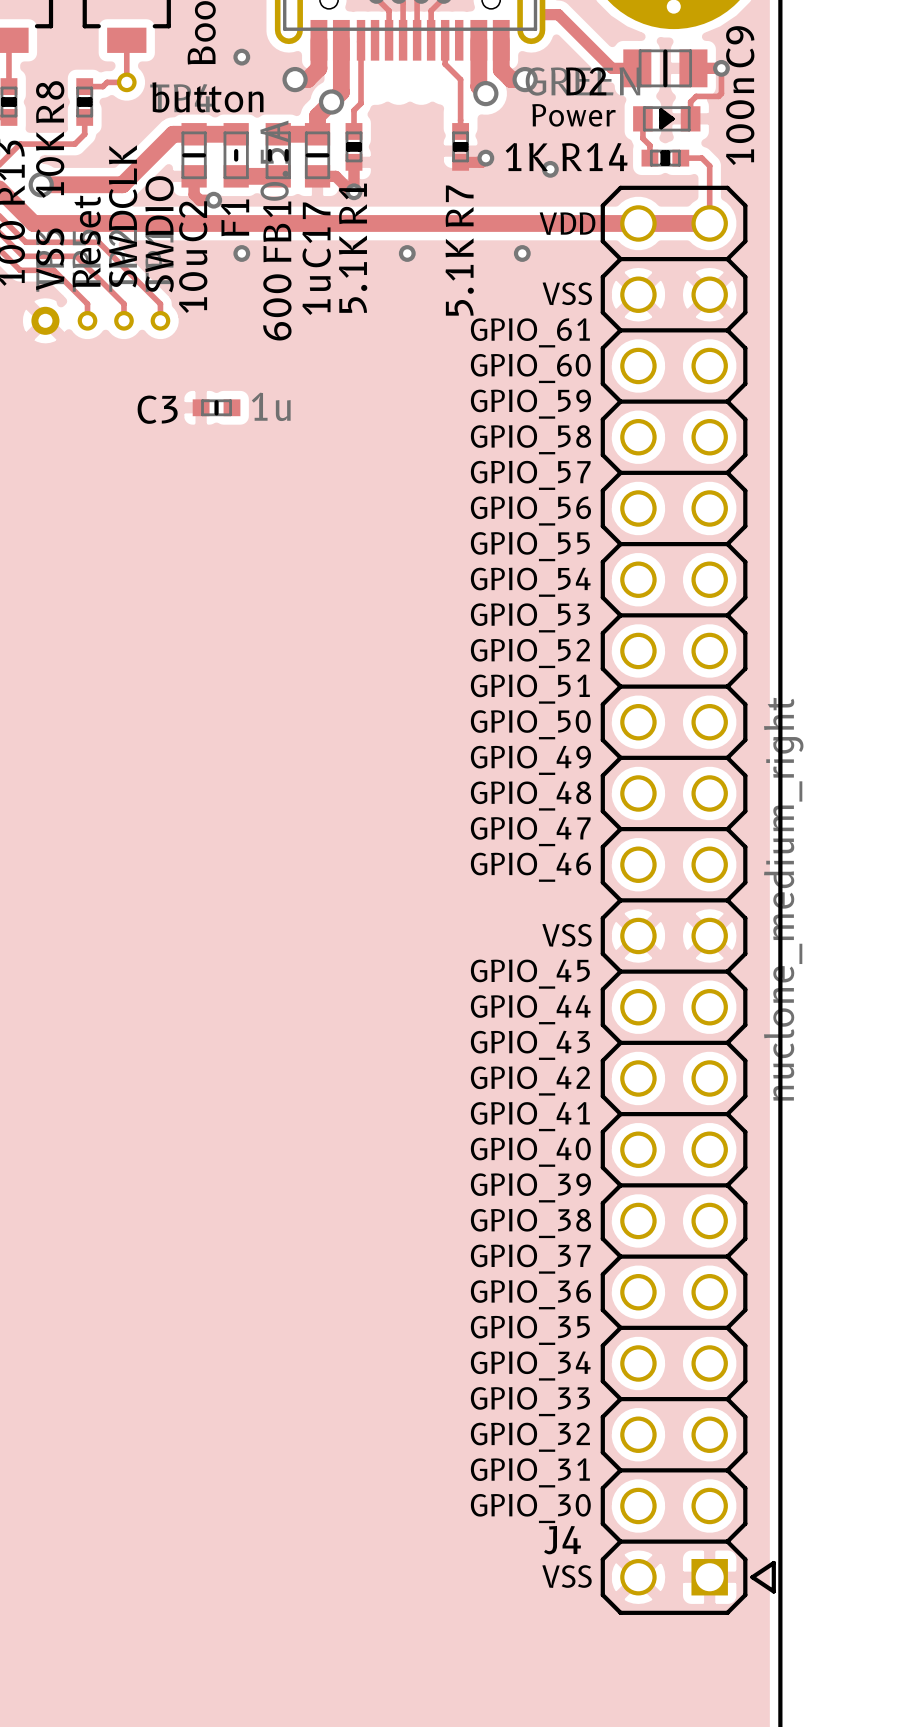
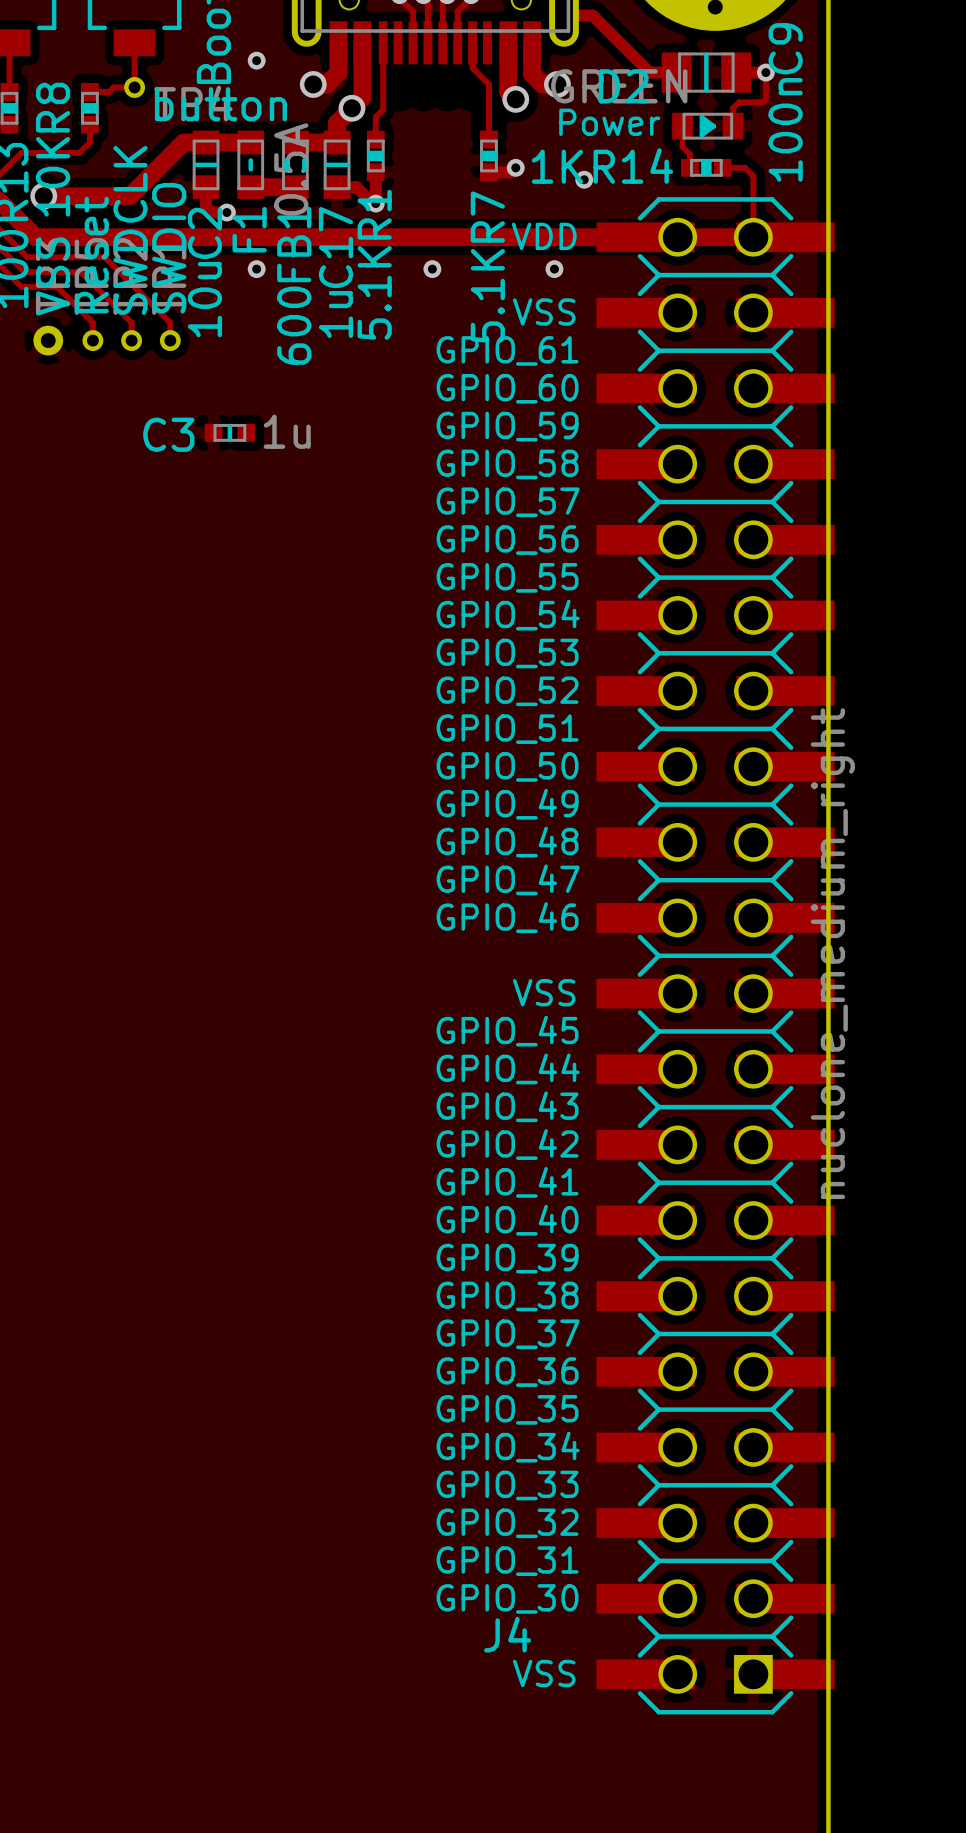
J4 footprint: [600, 185, 776, 1615] -> [596, 197, 835, 1715]
J4 name position: J4 (562, 1540) -> J4 (507, 1634)

